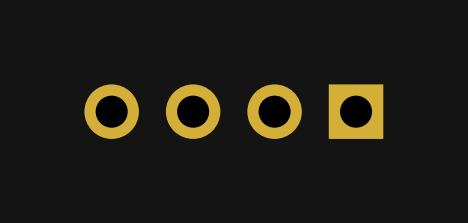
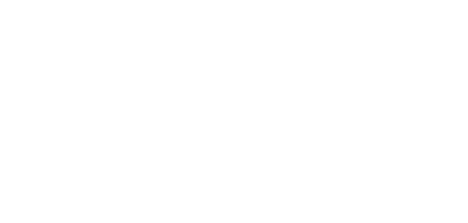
part: (233, 111) -> none

